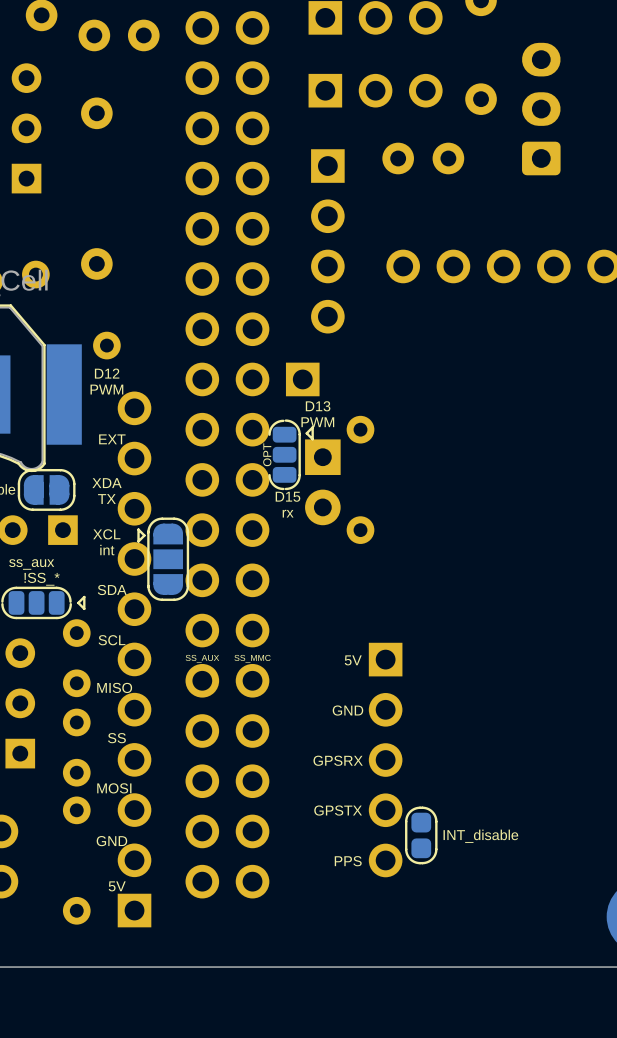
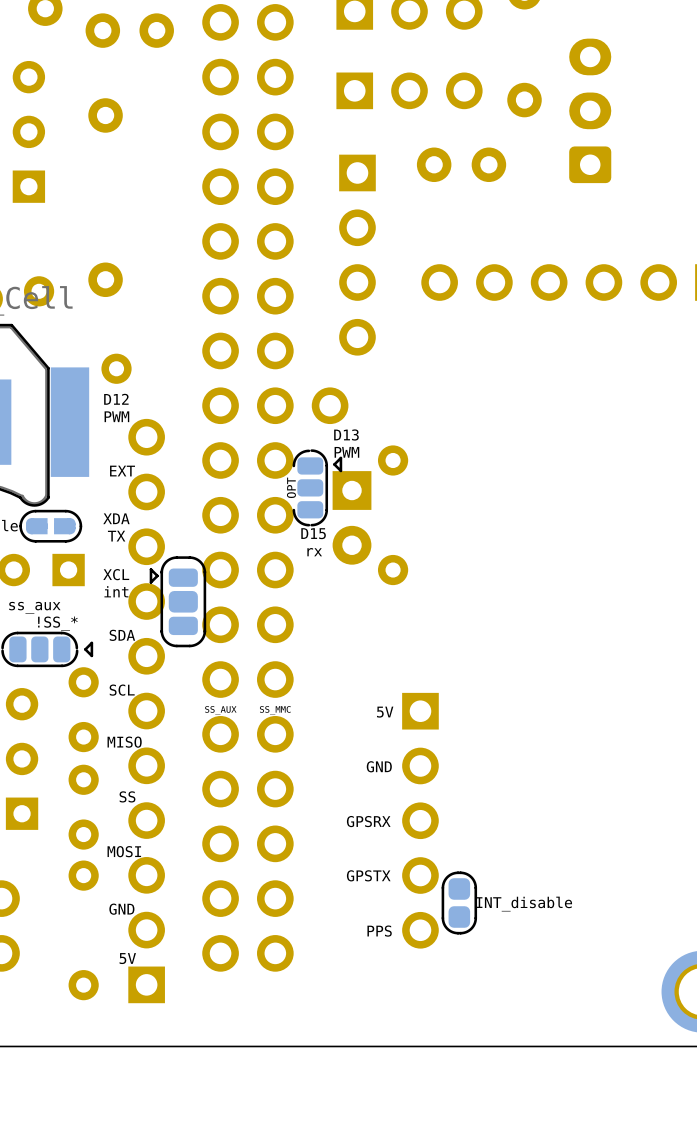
part footprint: [285, 362, 320, 397] -> [311, 387, 349, 425]
part footprint: [17, 468, 76, 511] -> [19, 509, 83, 543]
part footprint: [137, 517, 190, 601] -> [149, 556, 207, 648]

